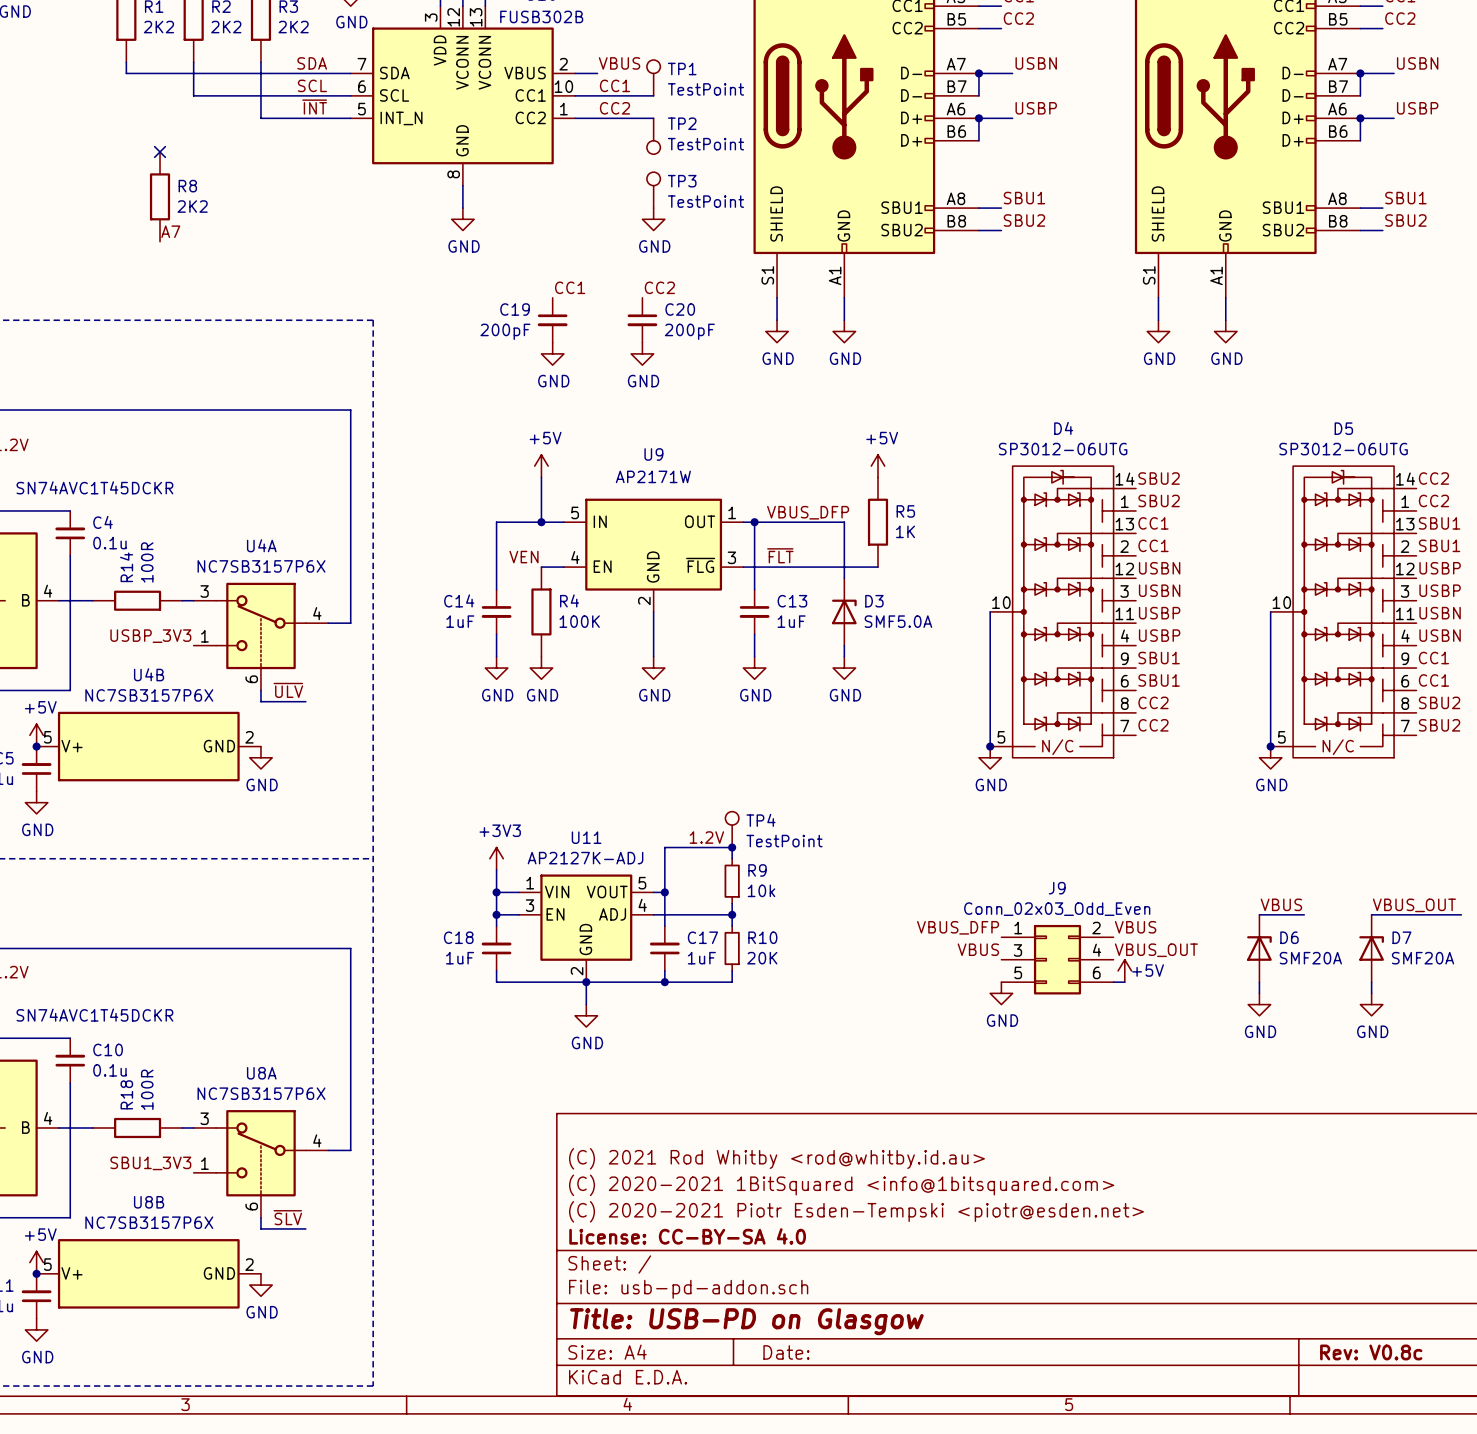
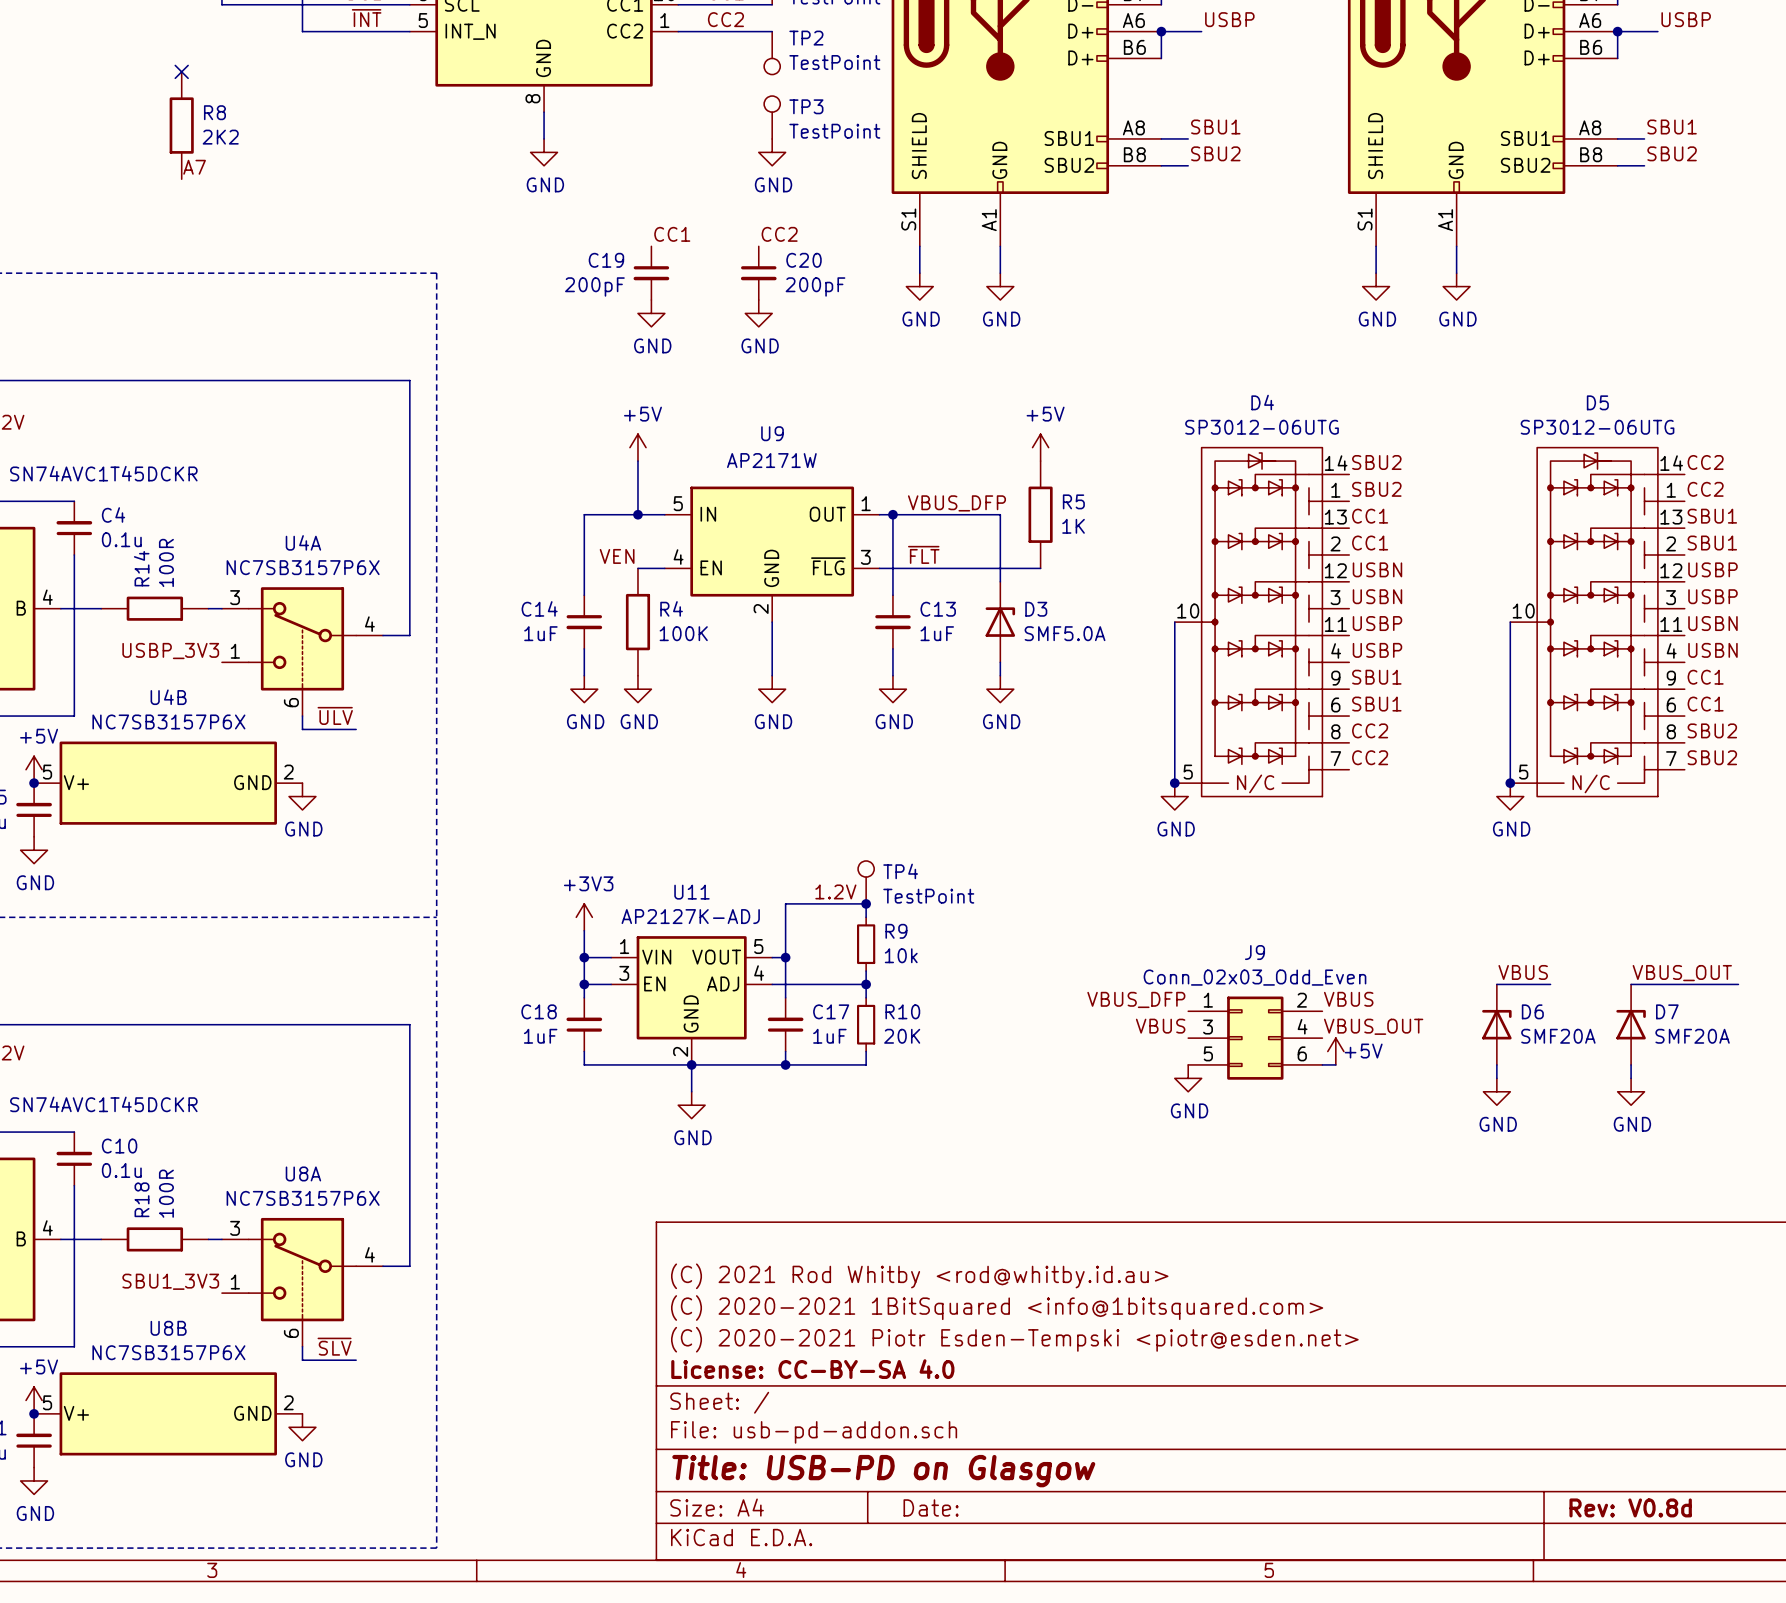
title block: Rev: V0.8c (1371, 1352) -> Rev: V0.8d (1630, 1507)

